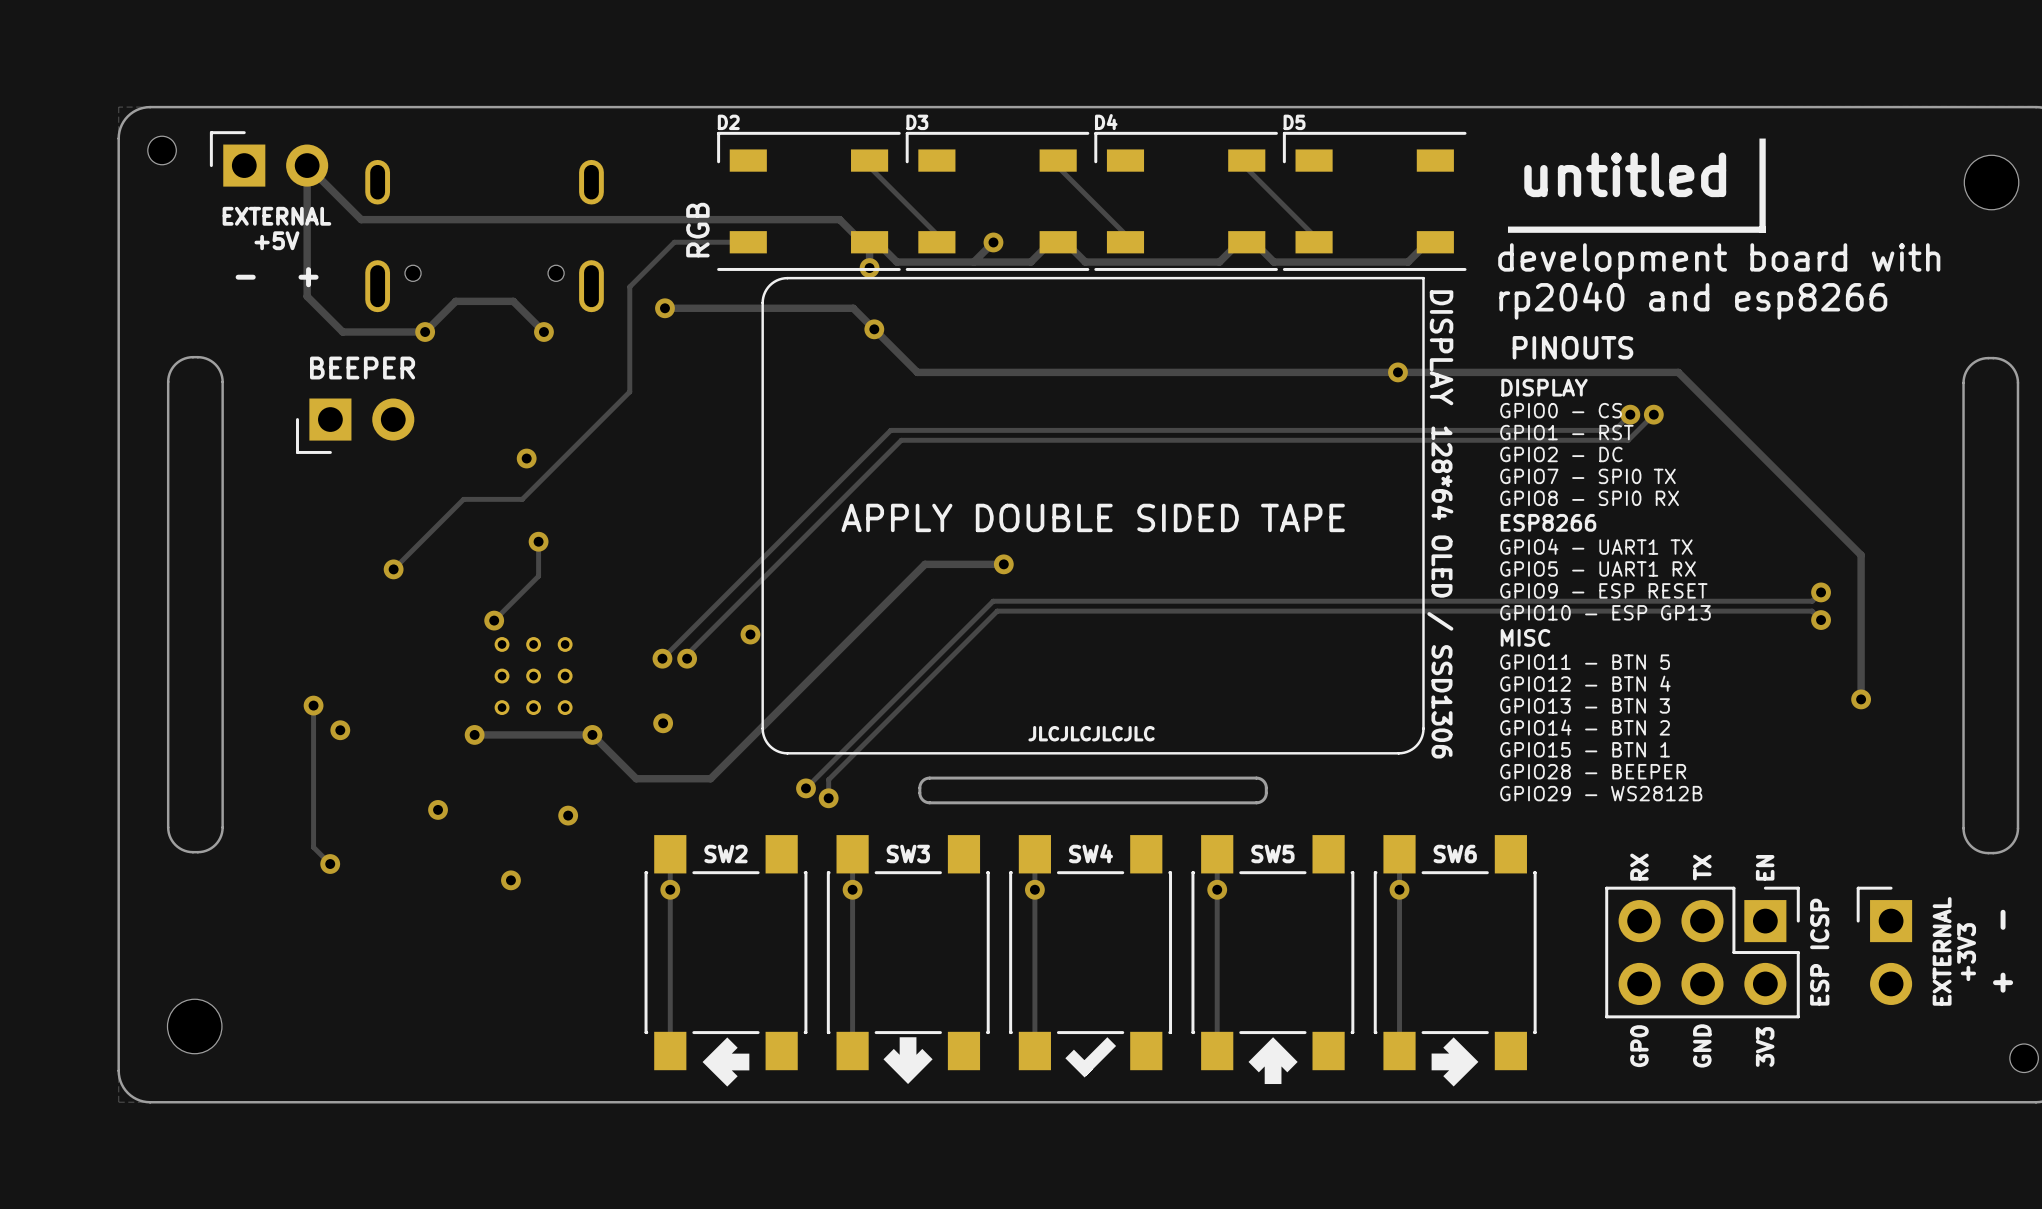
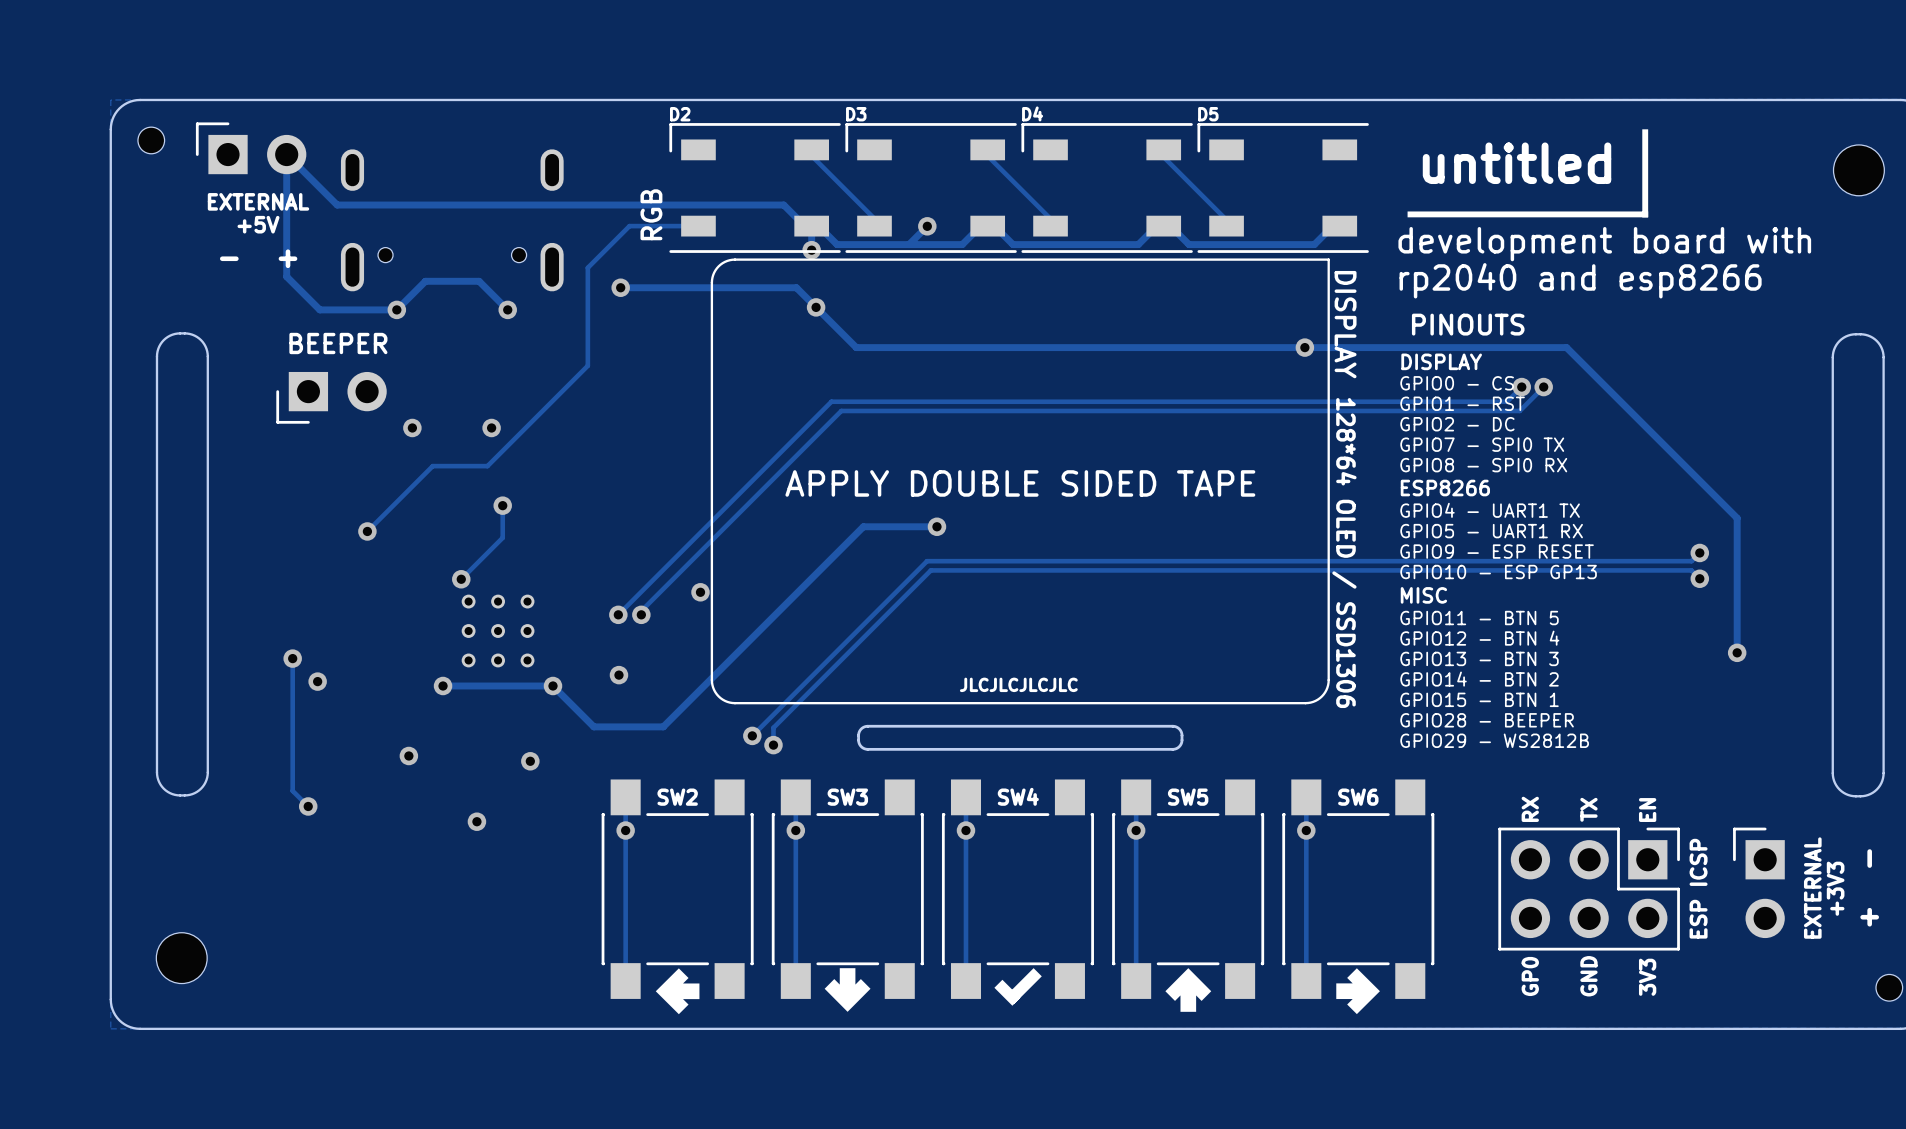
via: none -> (412, 427)

